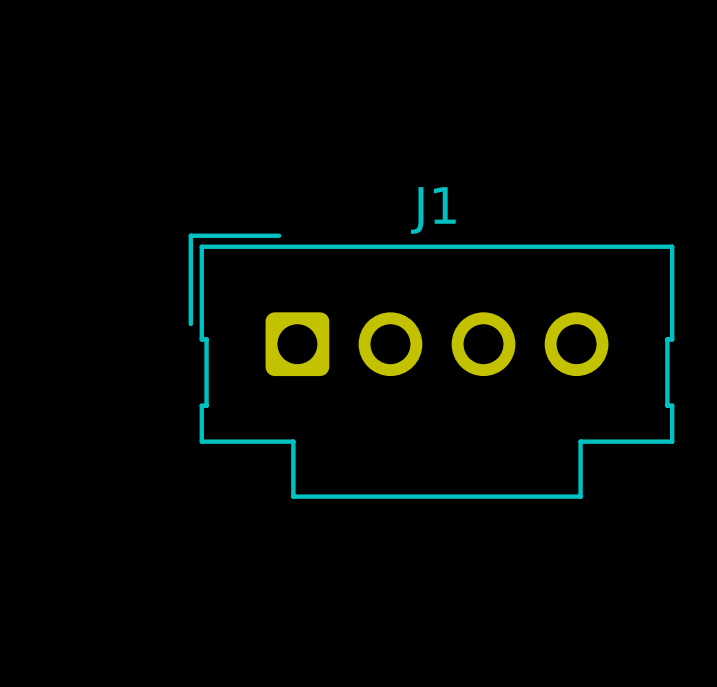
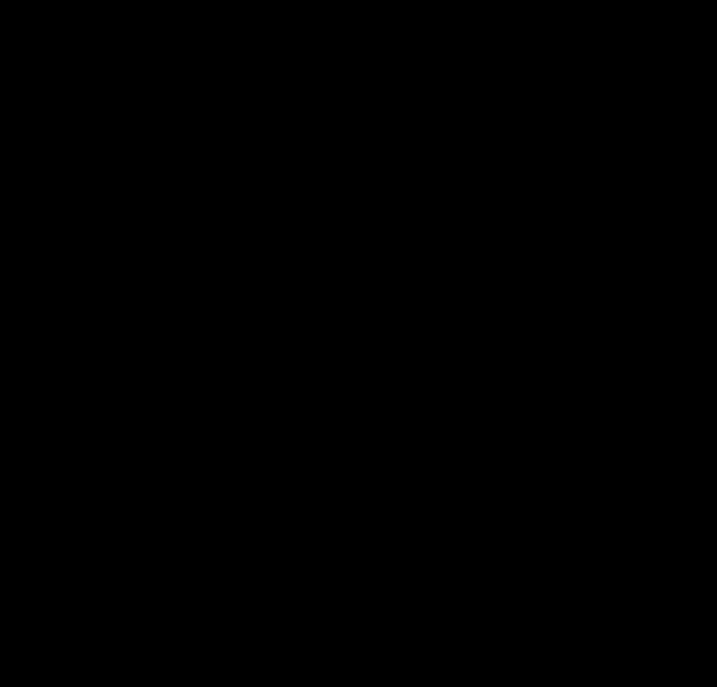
J1: (431, 366) -> none

